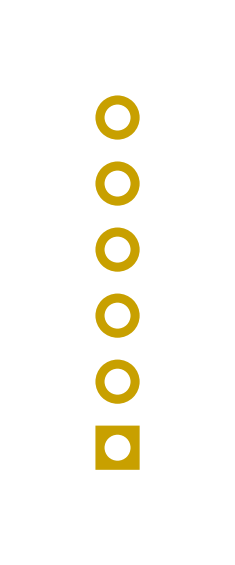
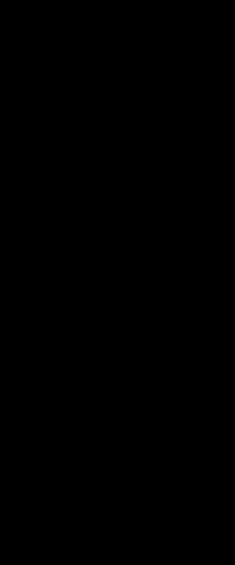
part: (117, 282) -> none

